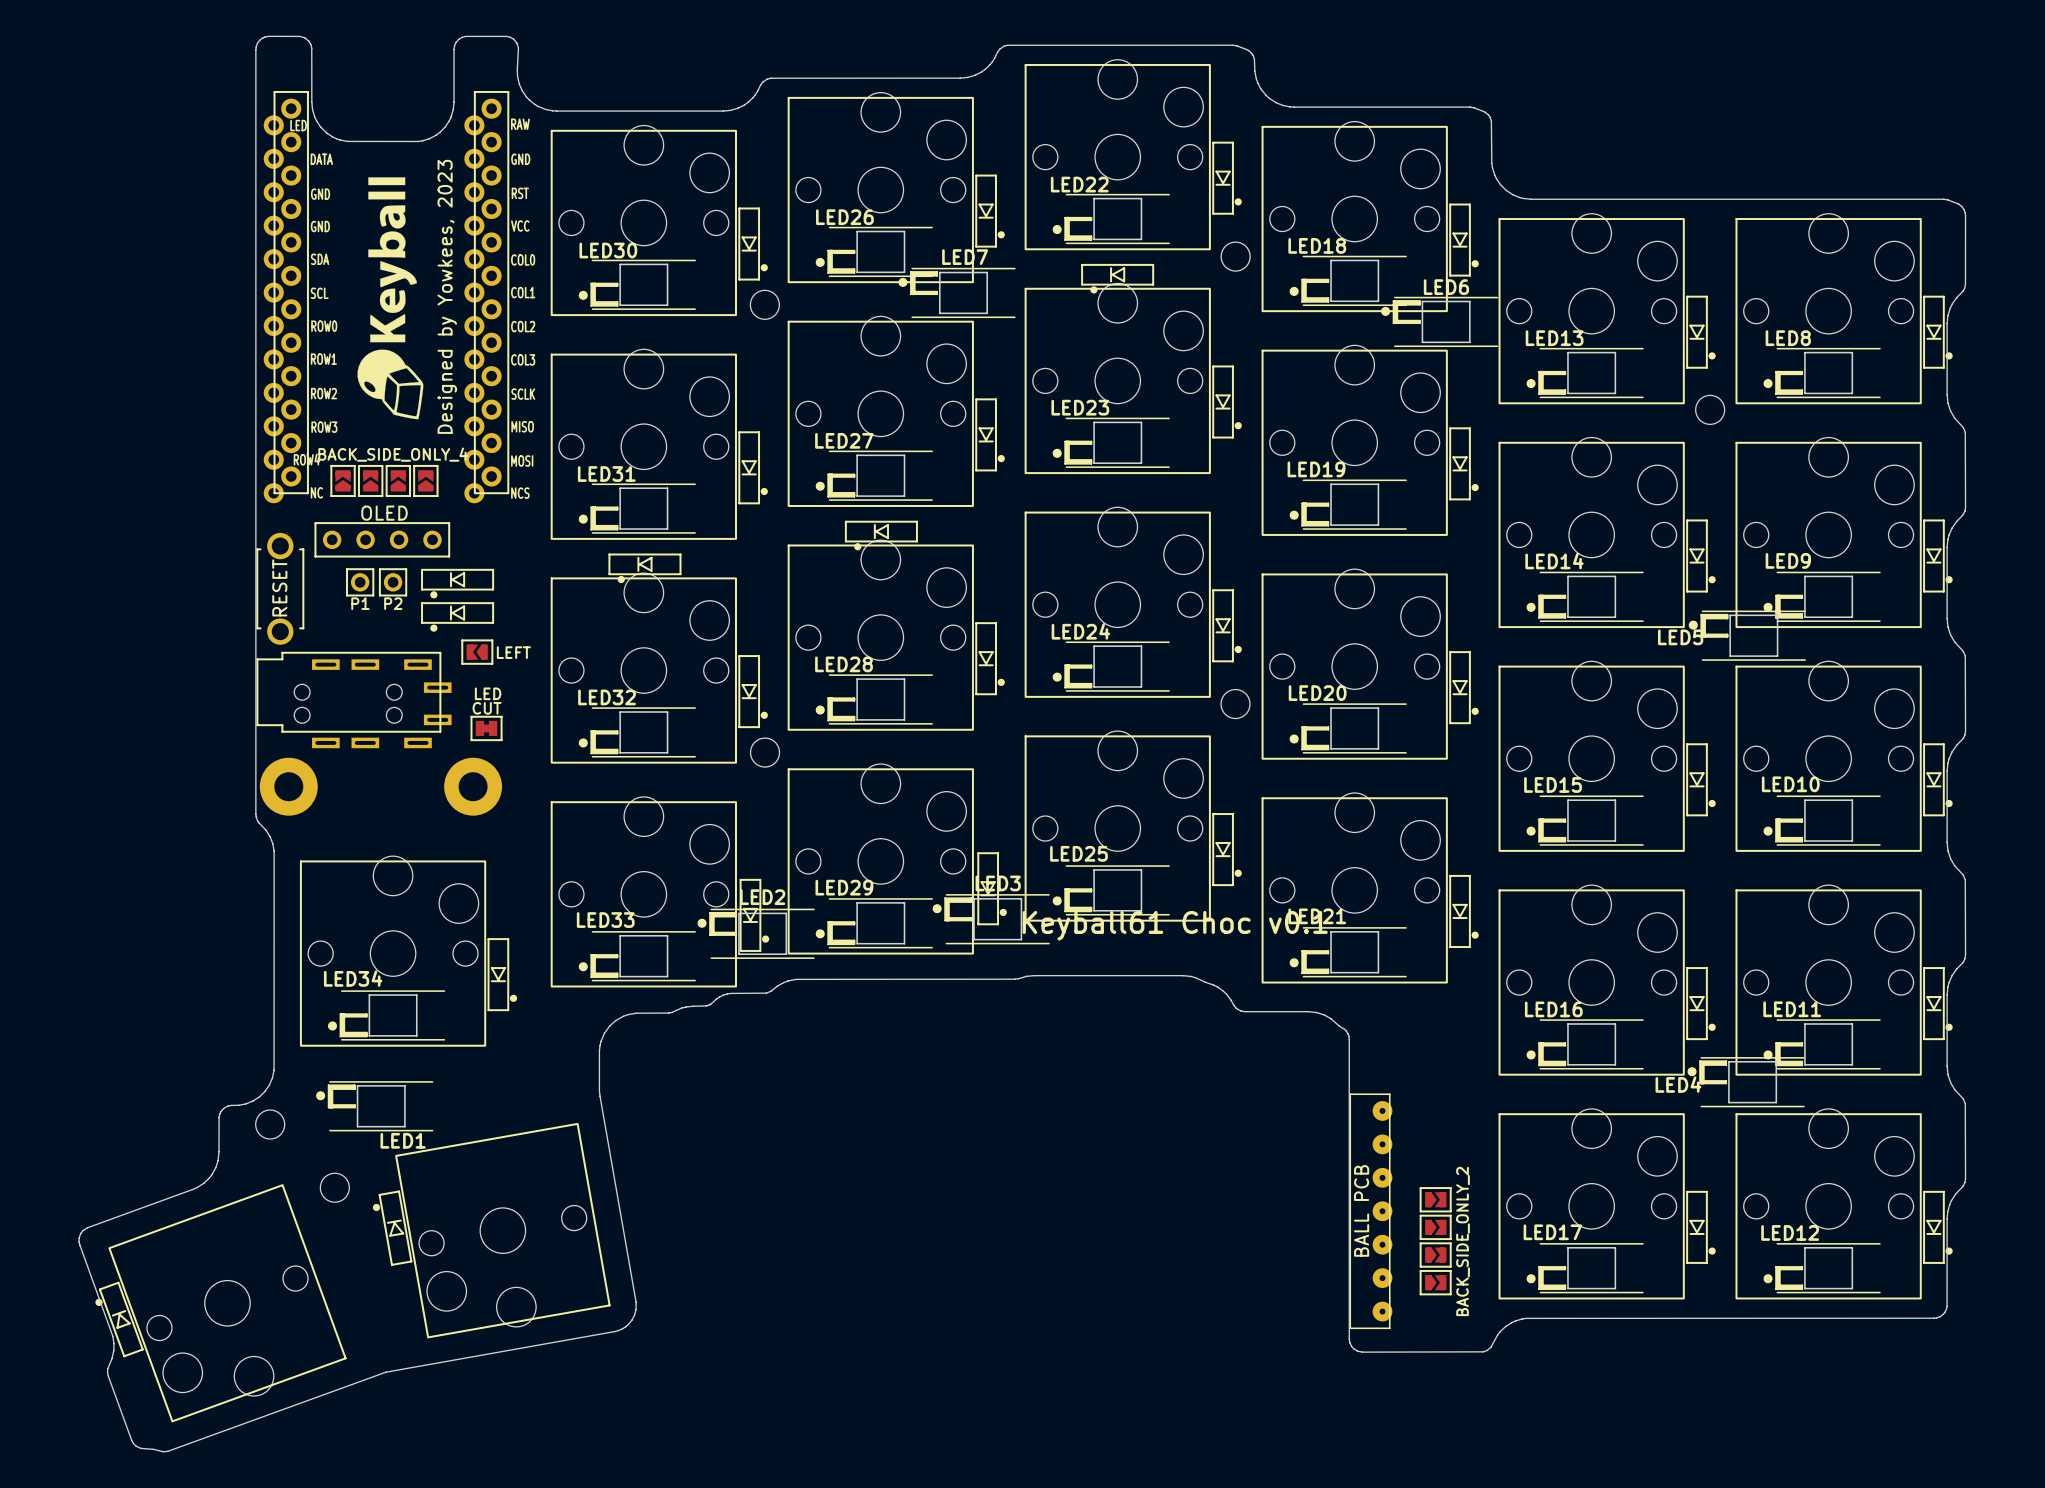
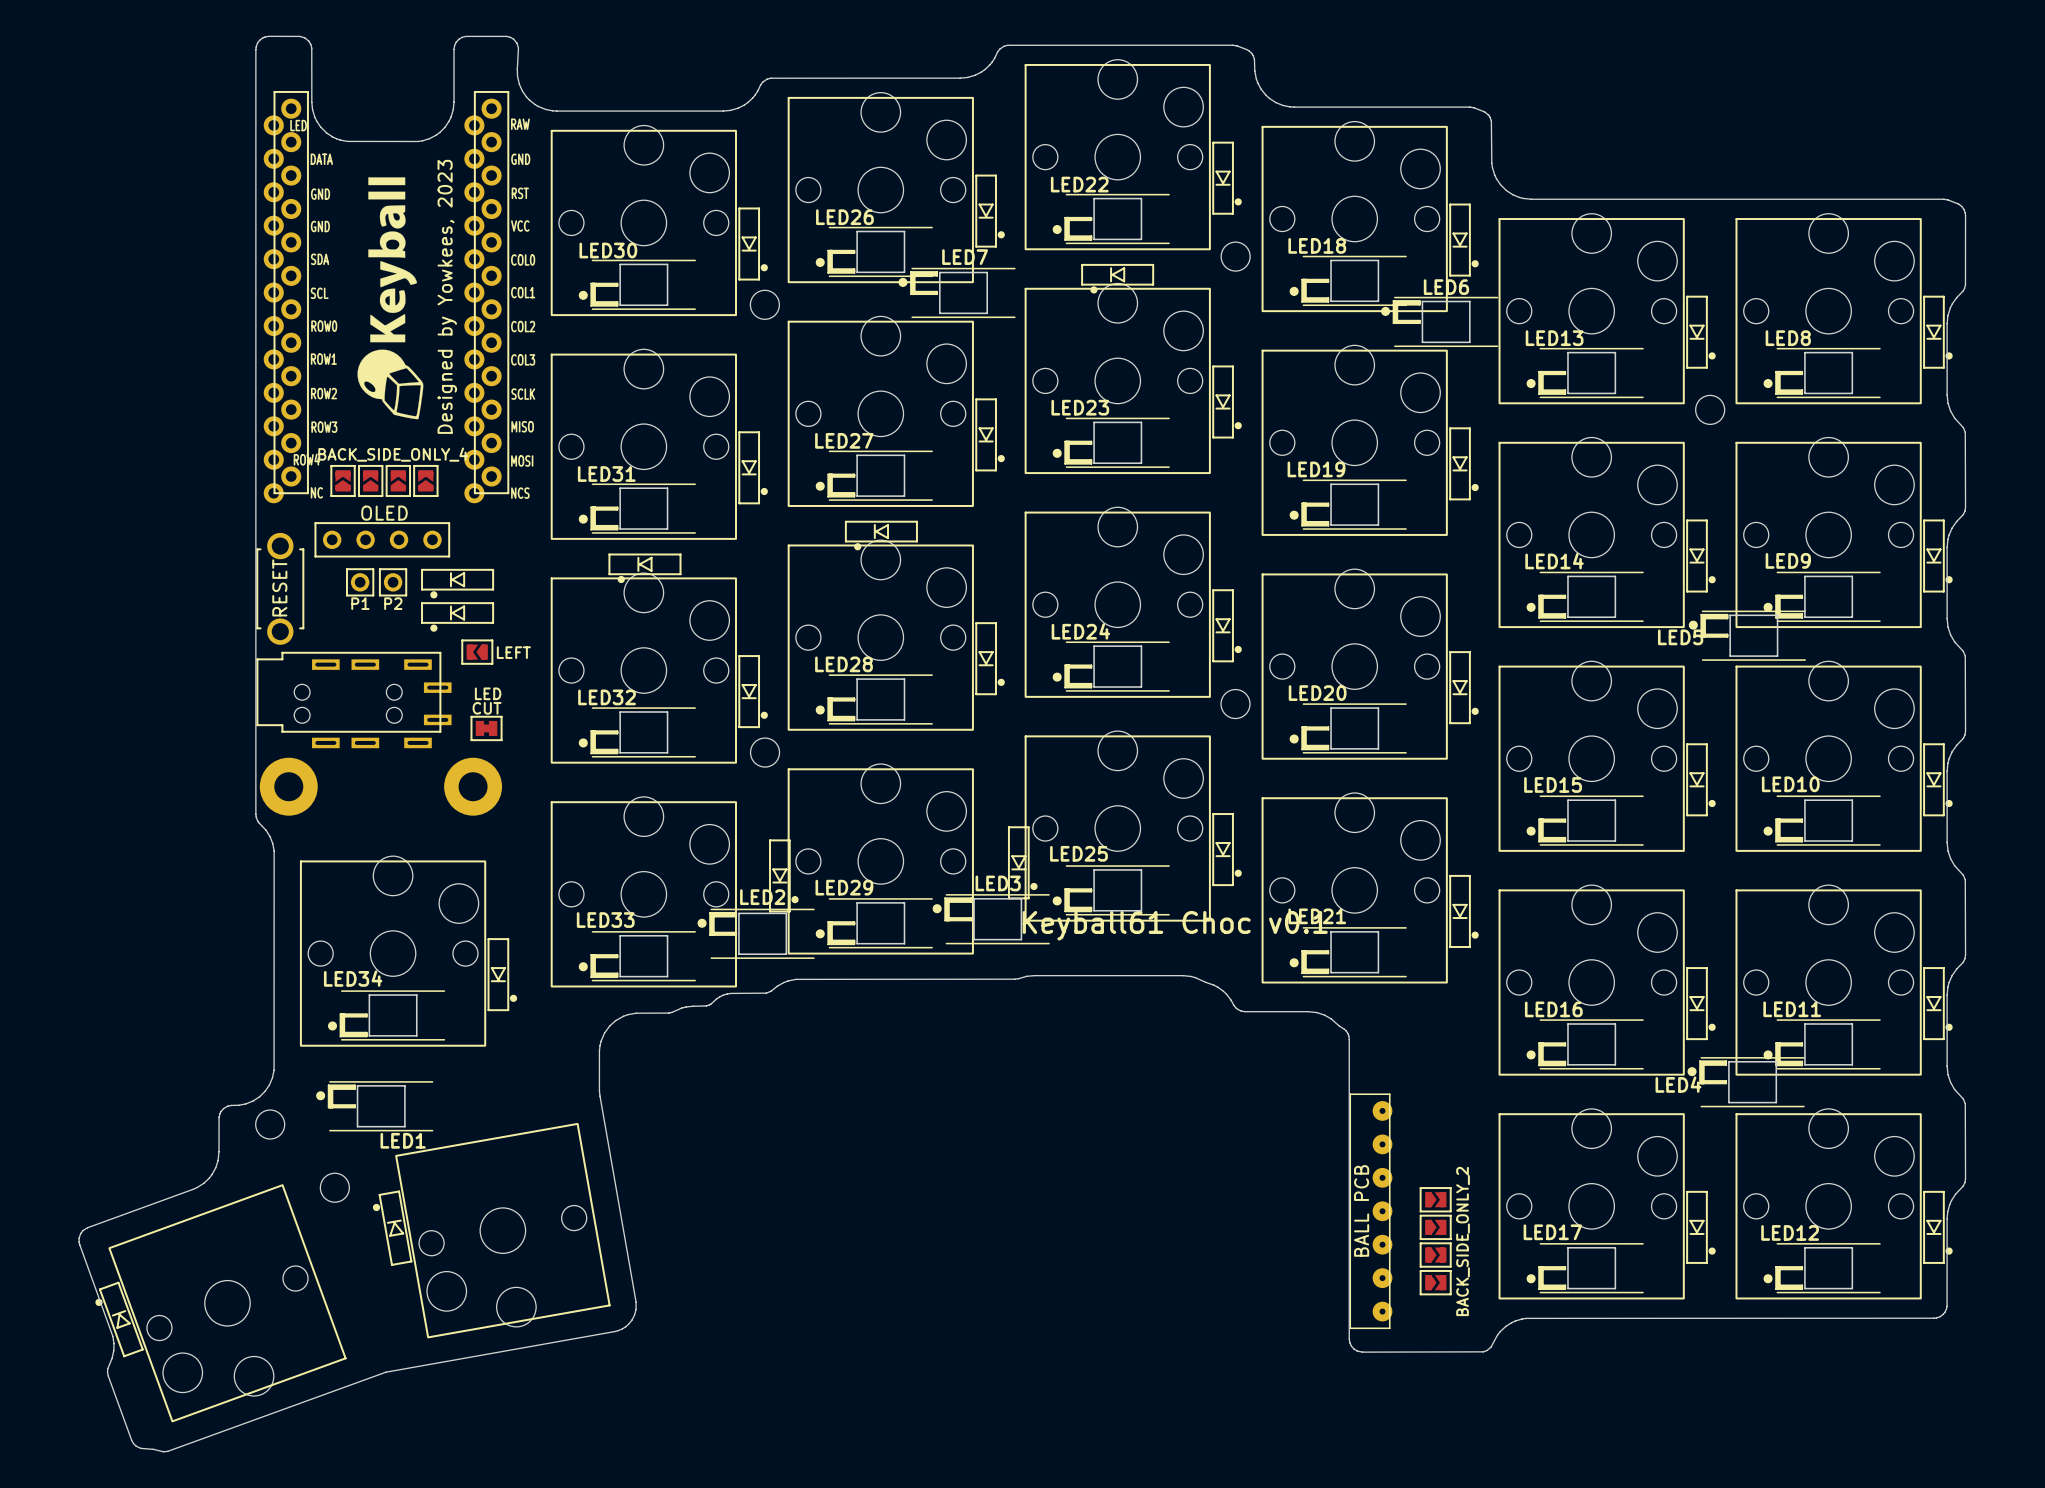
part position: (992, 888) -> (1022, 862)
part position: (754, 915) -> (783, 875)

